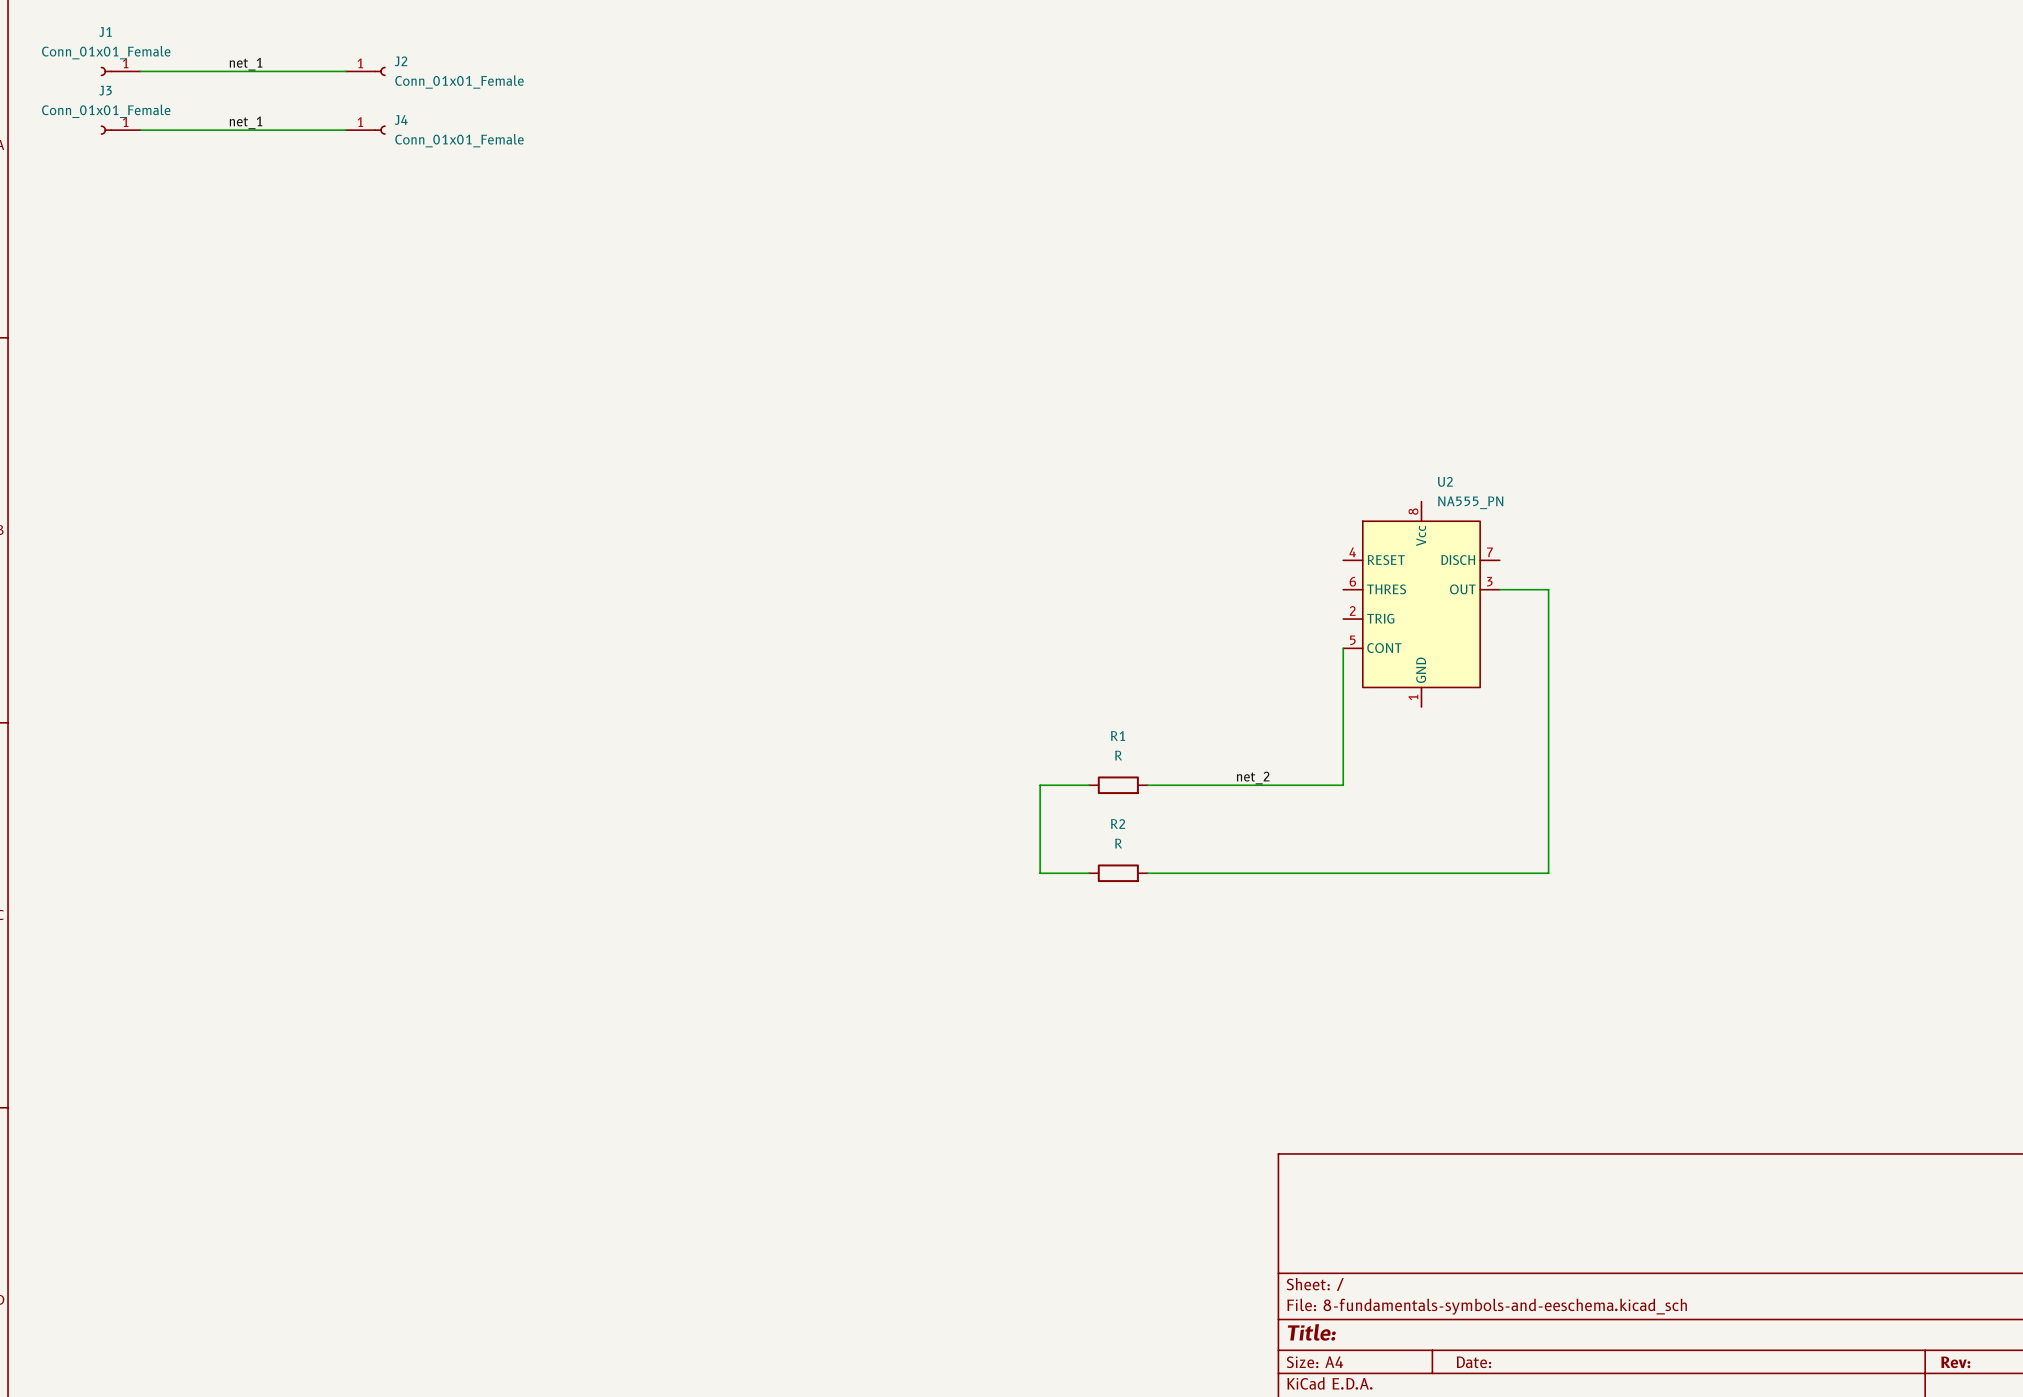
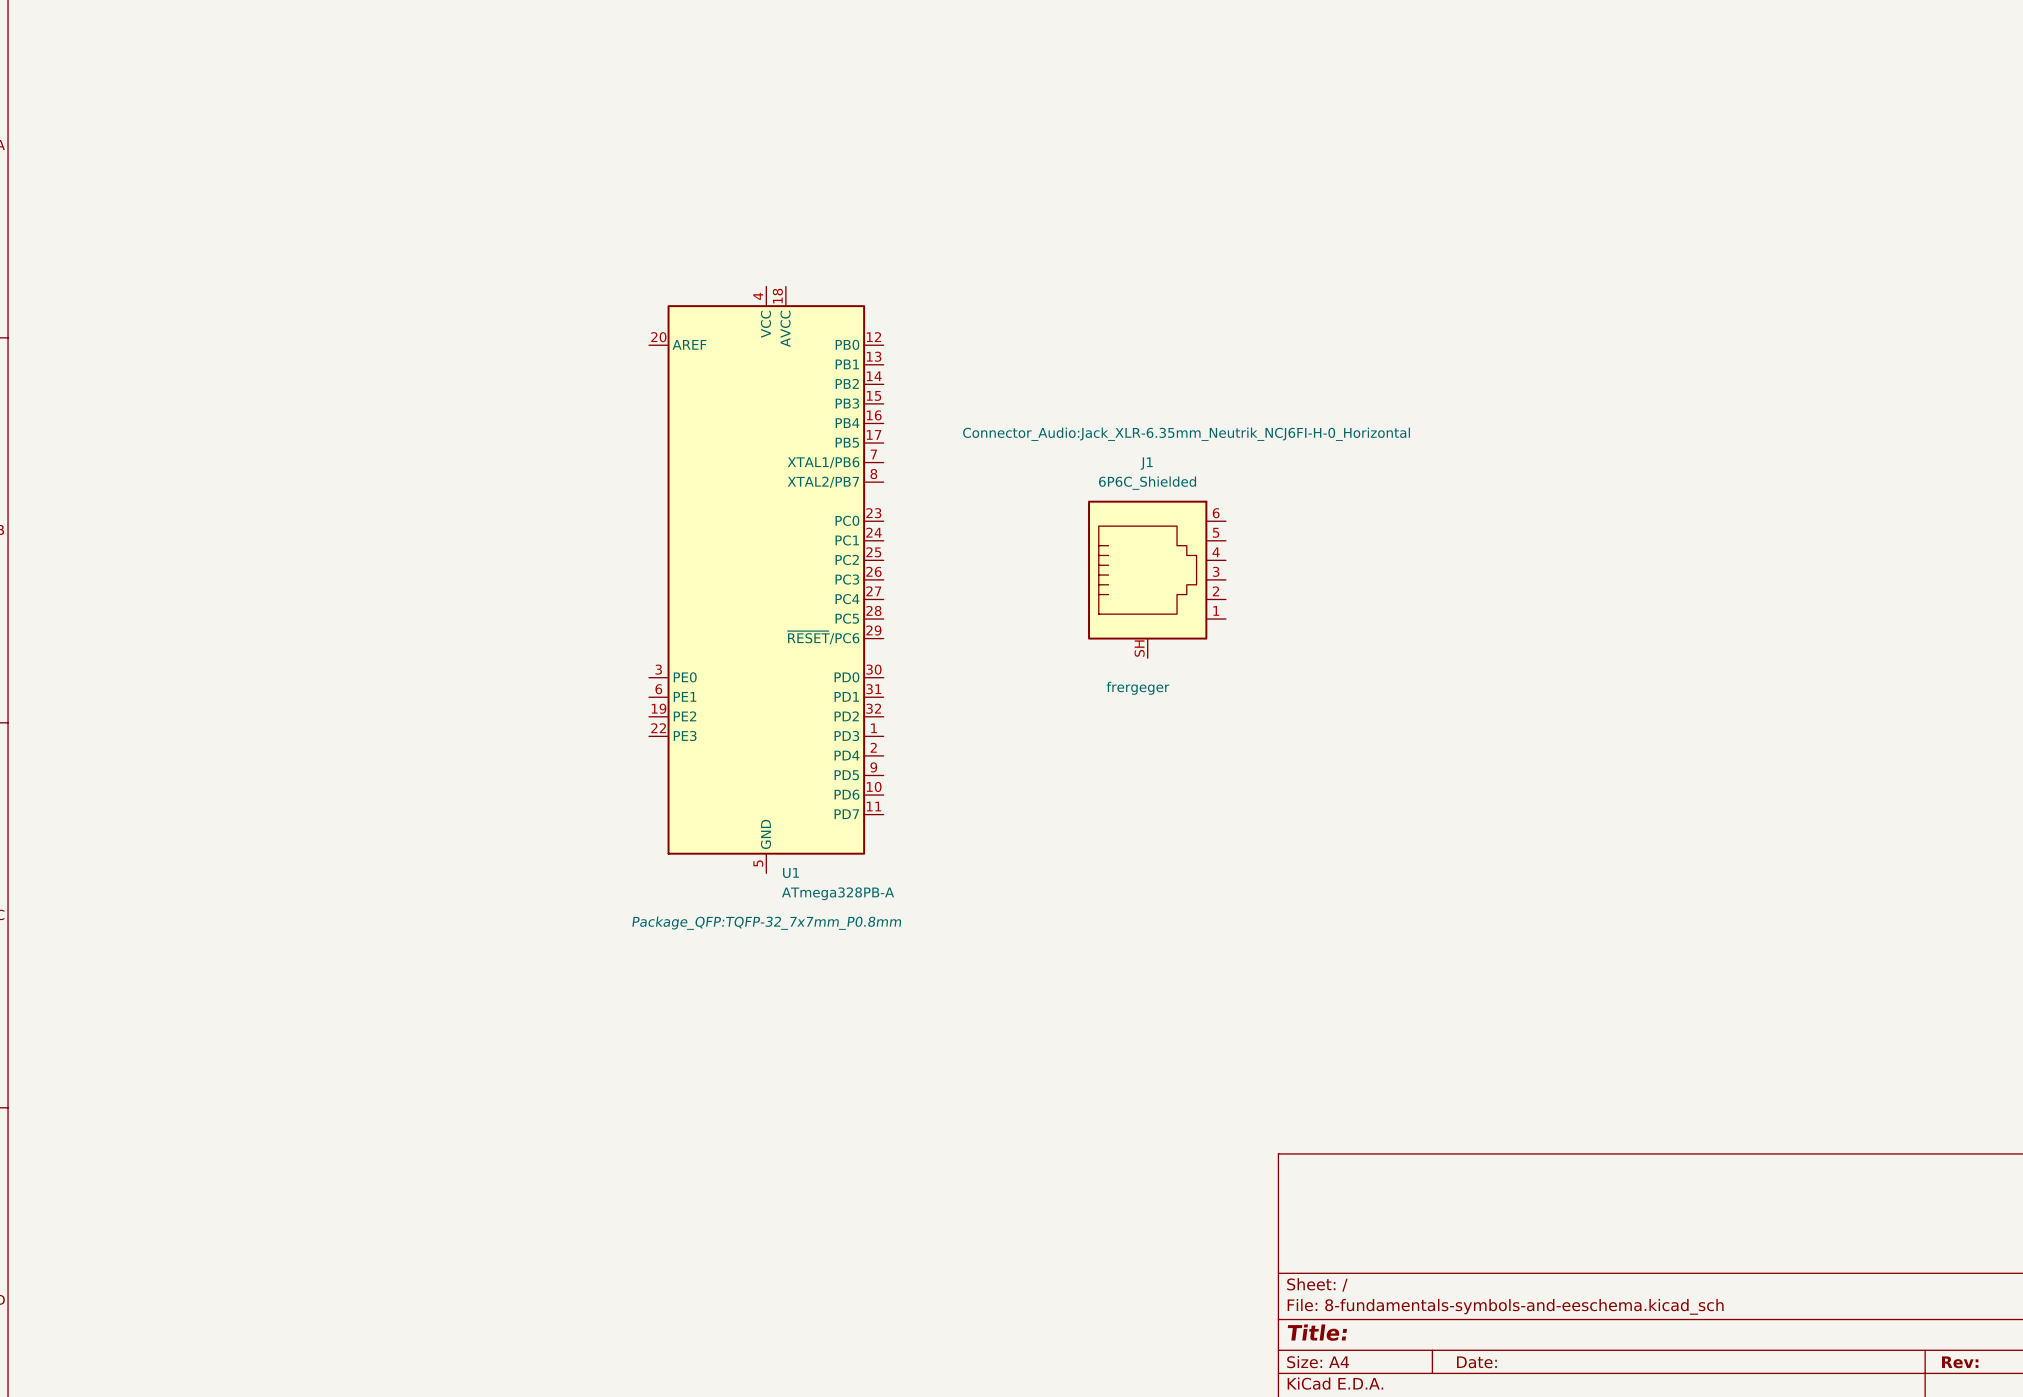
J1 name position: J1 (105, 32) -> J1 (1146, 463)
J1 value: Conn_01x01_Female (106, 52) -> 6P6C_Shielded (1147, 483)
label: net_1 (246, 64) -> none
J1 symbol: [100, 66, 141, 76] -> [1088, 500, 1226, 659]
wire: (140, 71) (345, 71) -> none
J2: Conn_01x01_Female (365, 71) -> none
label: net_1 (246, 122) -> none
J3: Conn_01x01_Female (120, 130) -> none
wire: (140, 130) (345, 130) -> none
J4: Conn_01x01_Female (365, 130) -> none
J1 text: none -> Connector_Audio:Jack_XLR-6.35mm_Neutrik_NCJ6FI-H-0_Horizontal (1186, 434)
U1: none -> ATmega328PB-A (766, 579)
wire: (1499, 589) (1548, 589) (1548, 873) (1147, 873) -> none
U2: NA555_PN (1421, 604) -> none
wire: (1343, 648) (1343, 785) (1147, 785) -> none
J1 text: none -> frergeger (1138, 688)
label: net_2 (1253, 778) -> none
wire: (1089, 785) (1040, 785) (1040, 873) (1089, 873) -> none
R1: R (1118, 785) -> none
R2: R (1118, 873) -> none

